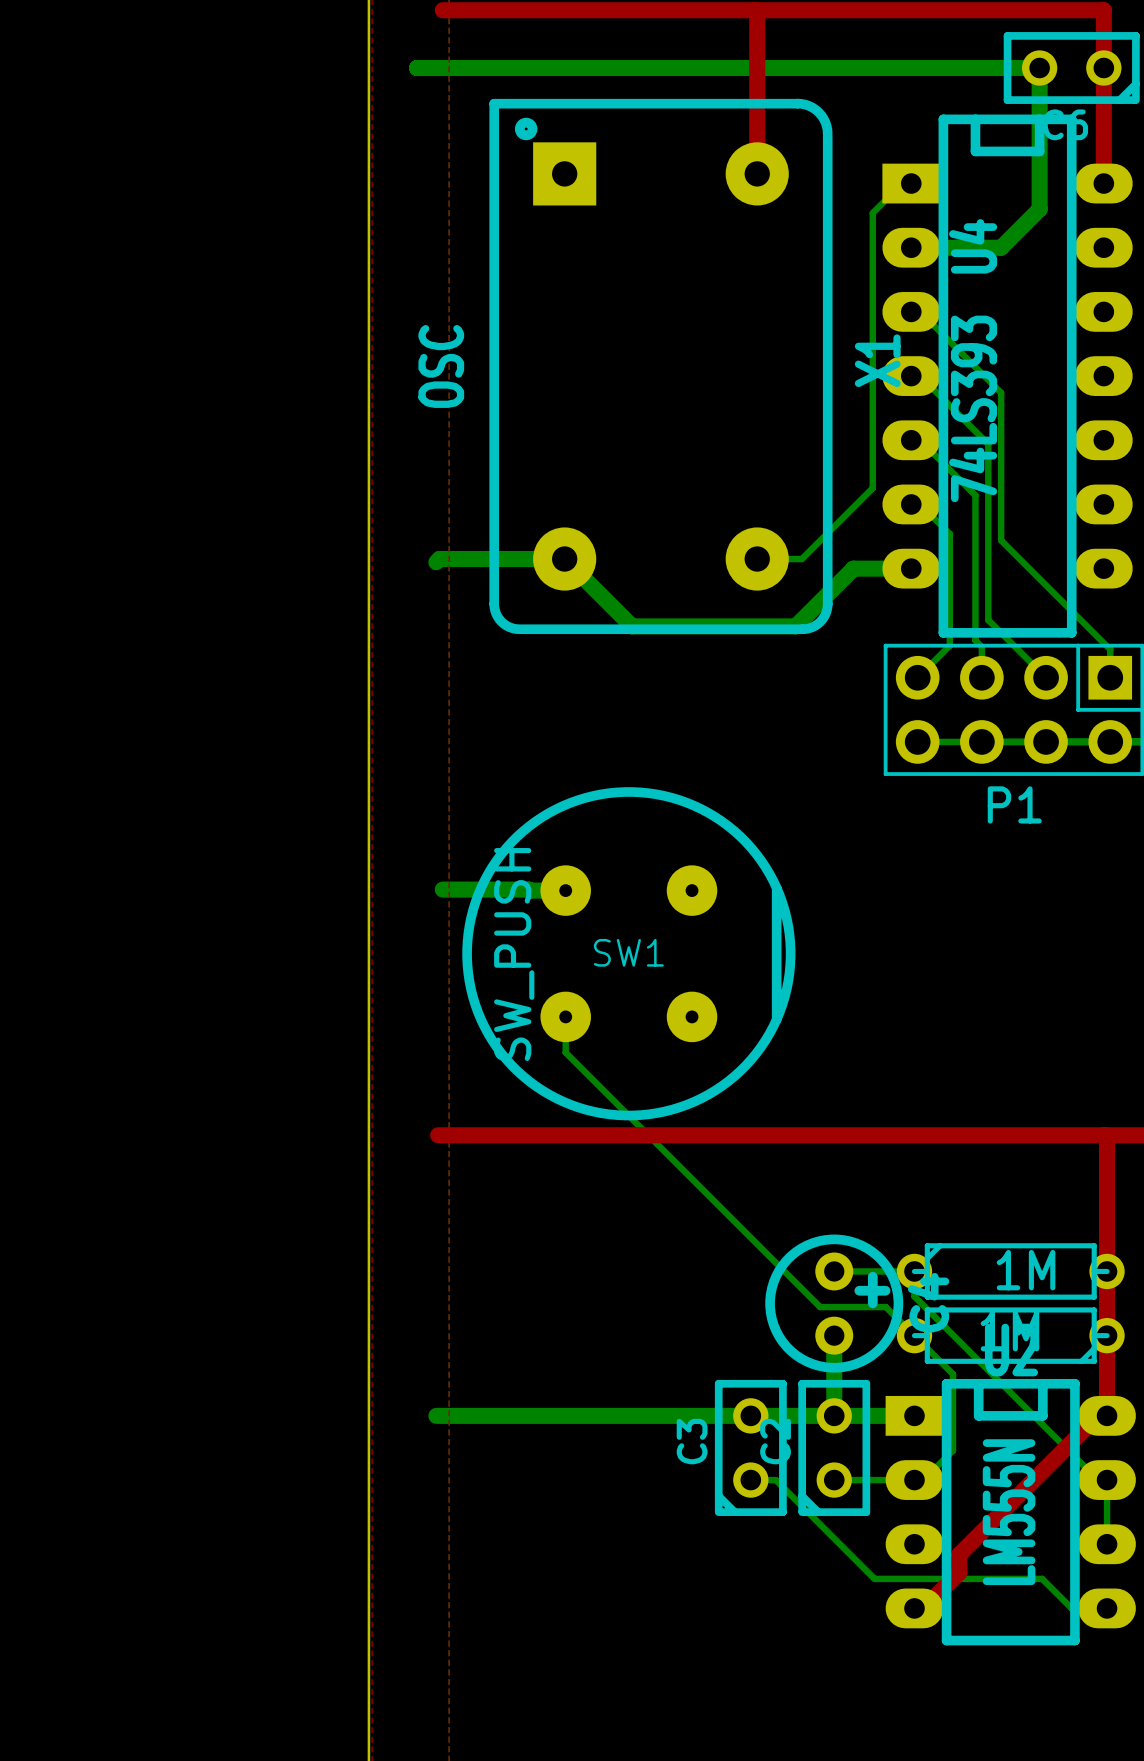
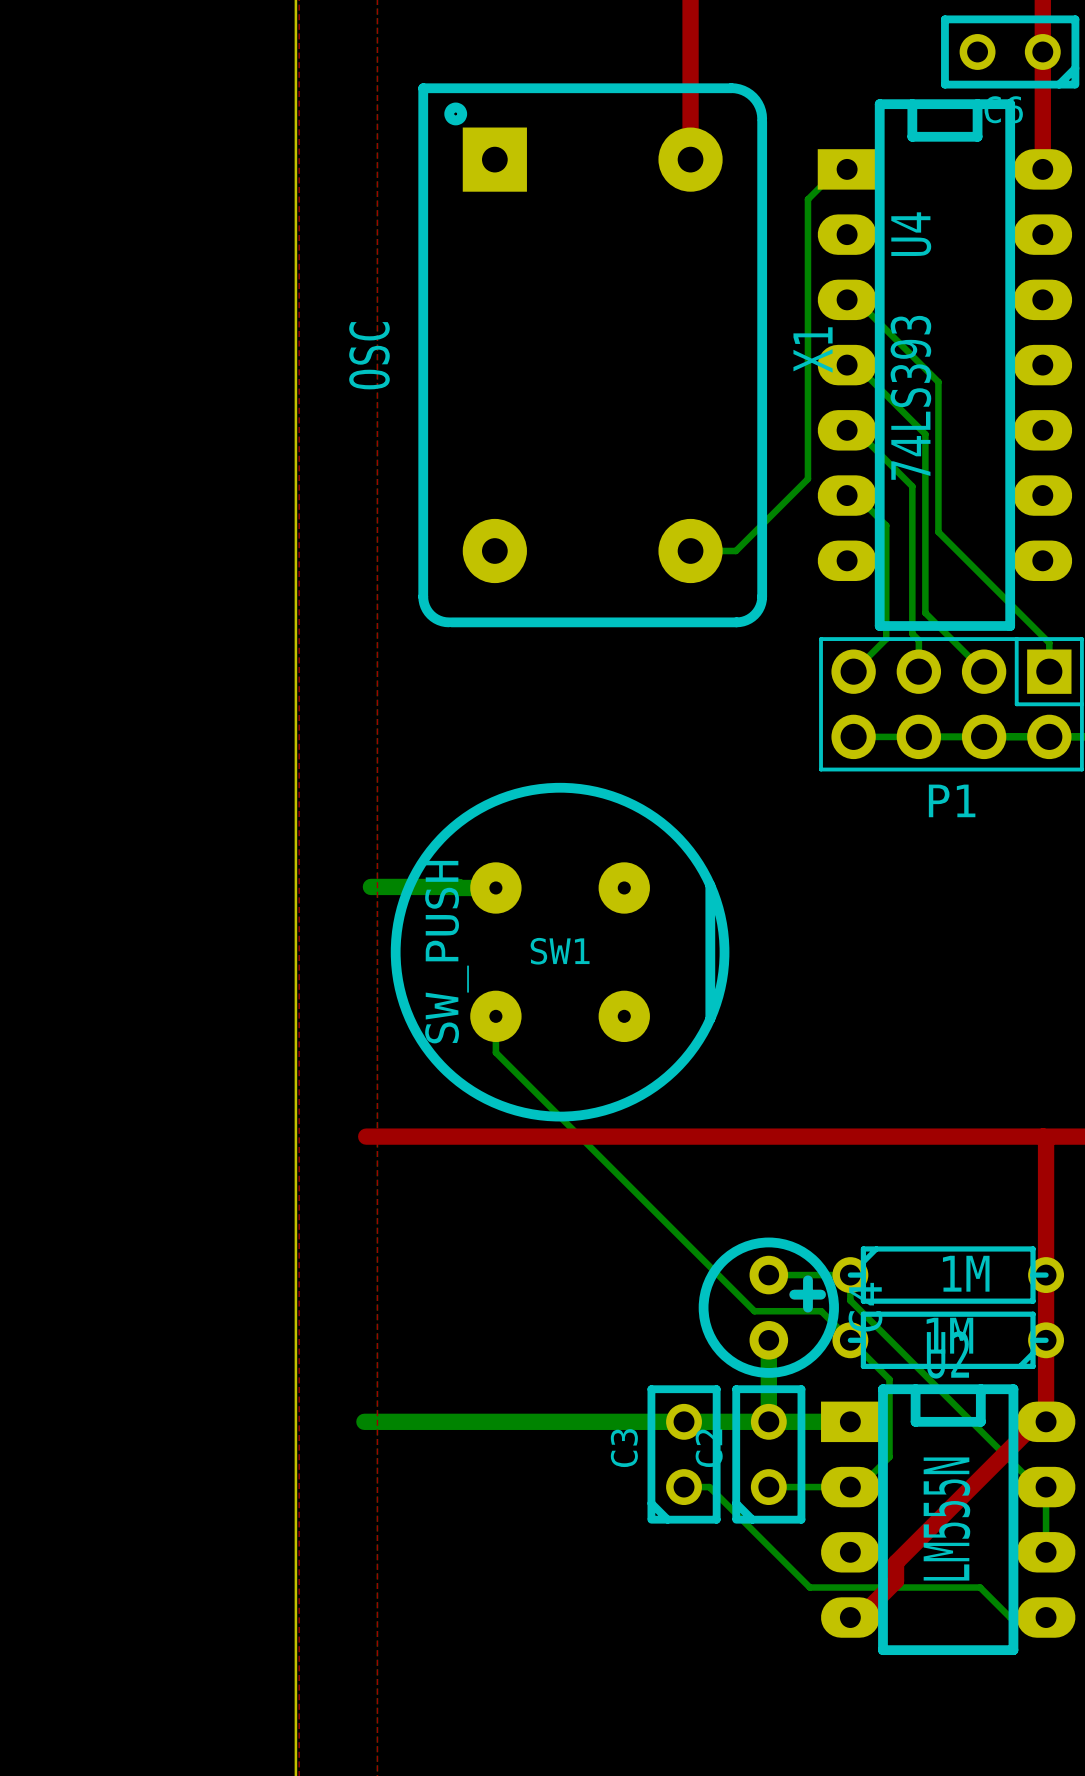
bottom track: (417, 68) (1039, 68) (1039, 209) (1001, 247) (911, 247) -> none
bottom track: (436, 562) (439, 559) (564, 559) (632, 626) (795, 626) (853, 568) (911, 568) -> none

